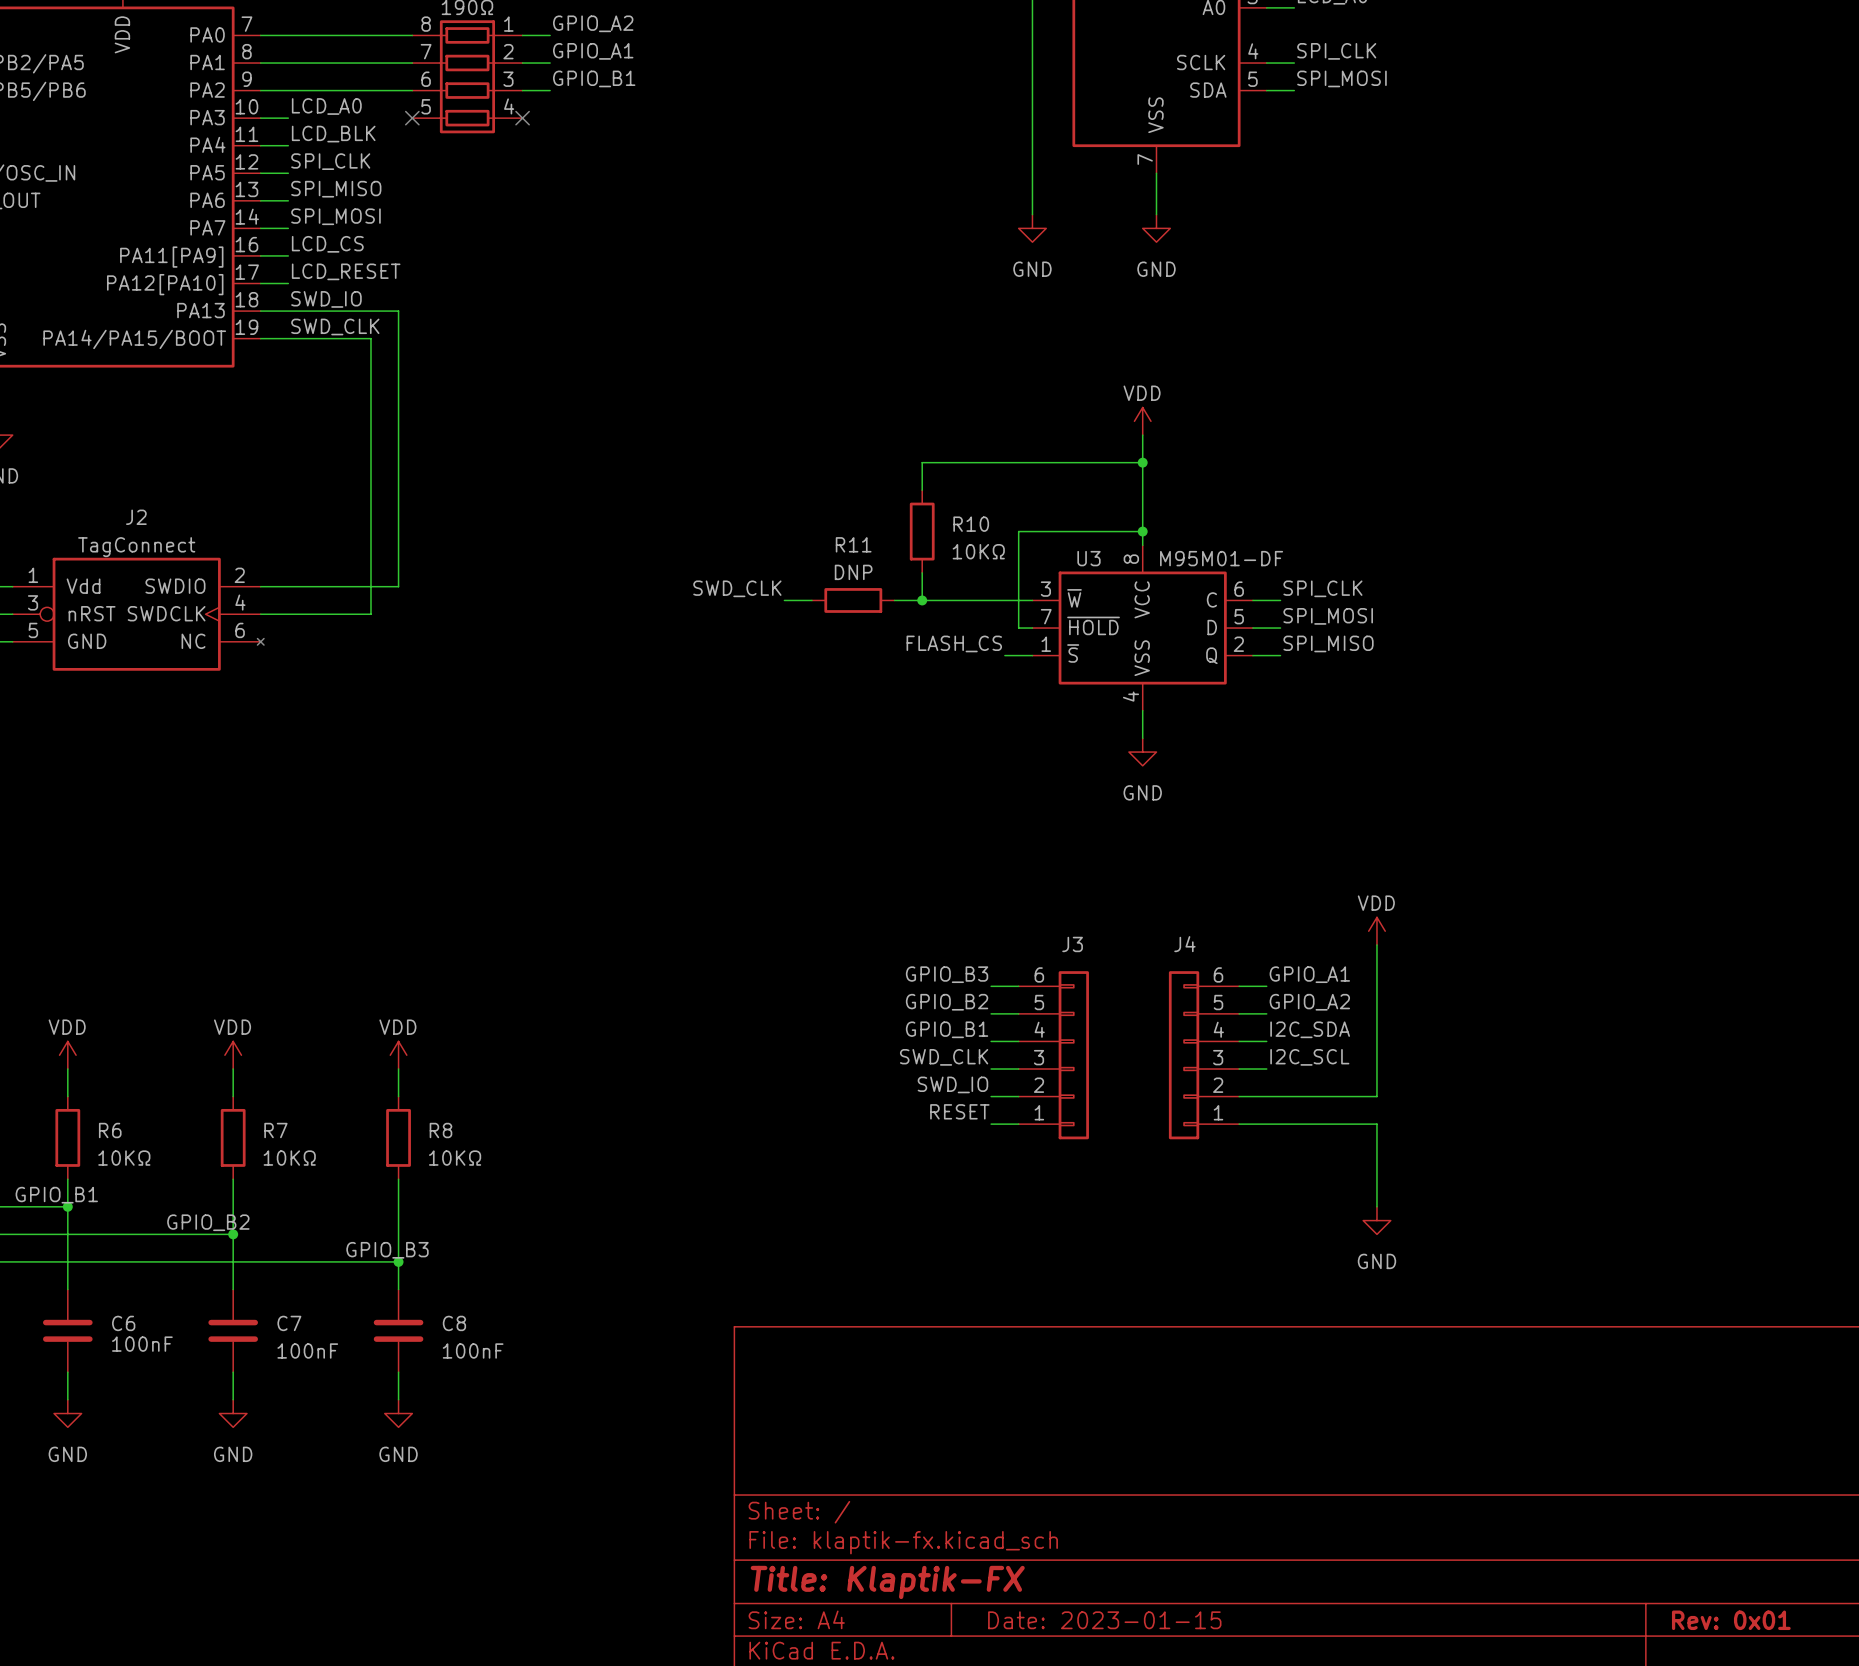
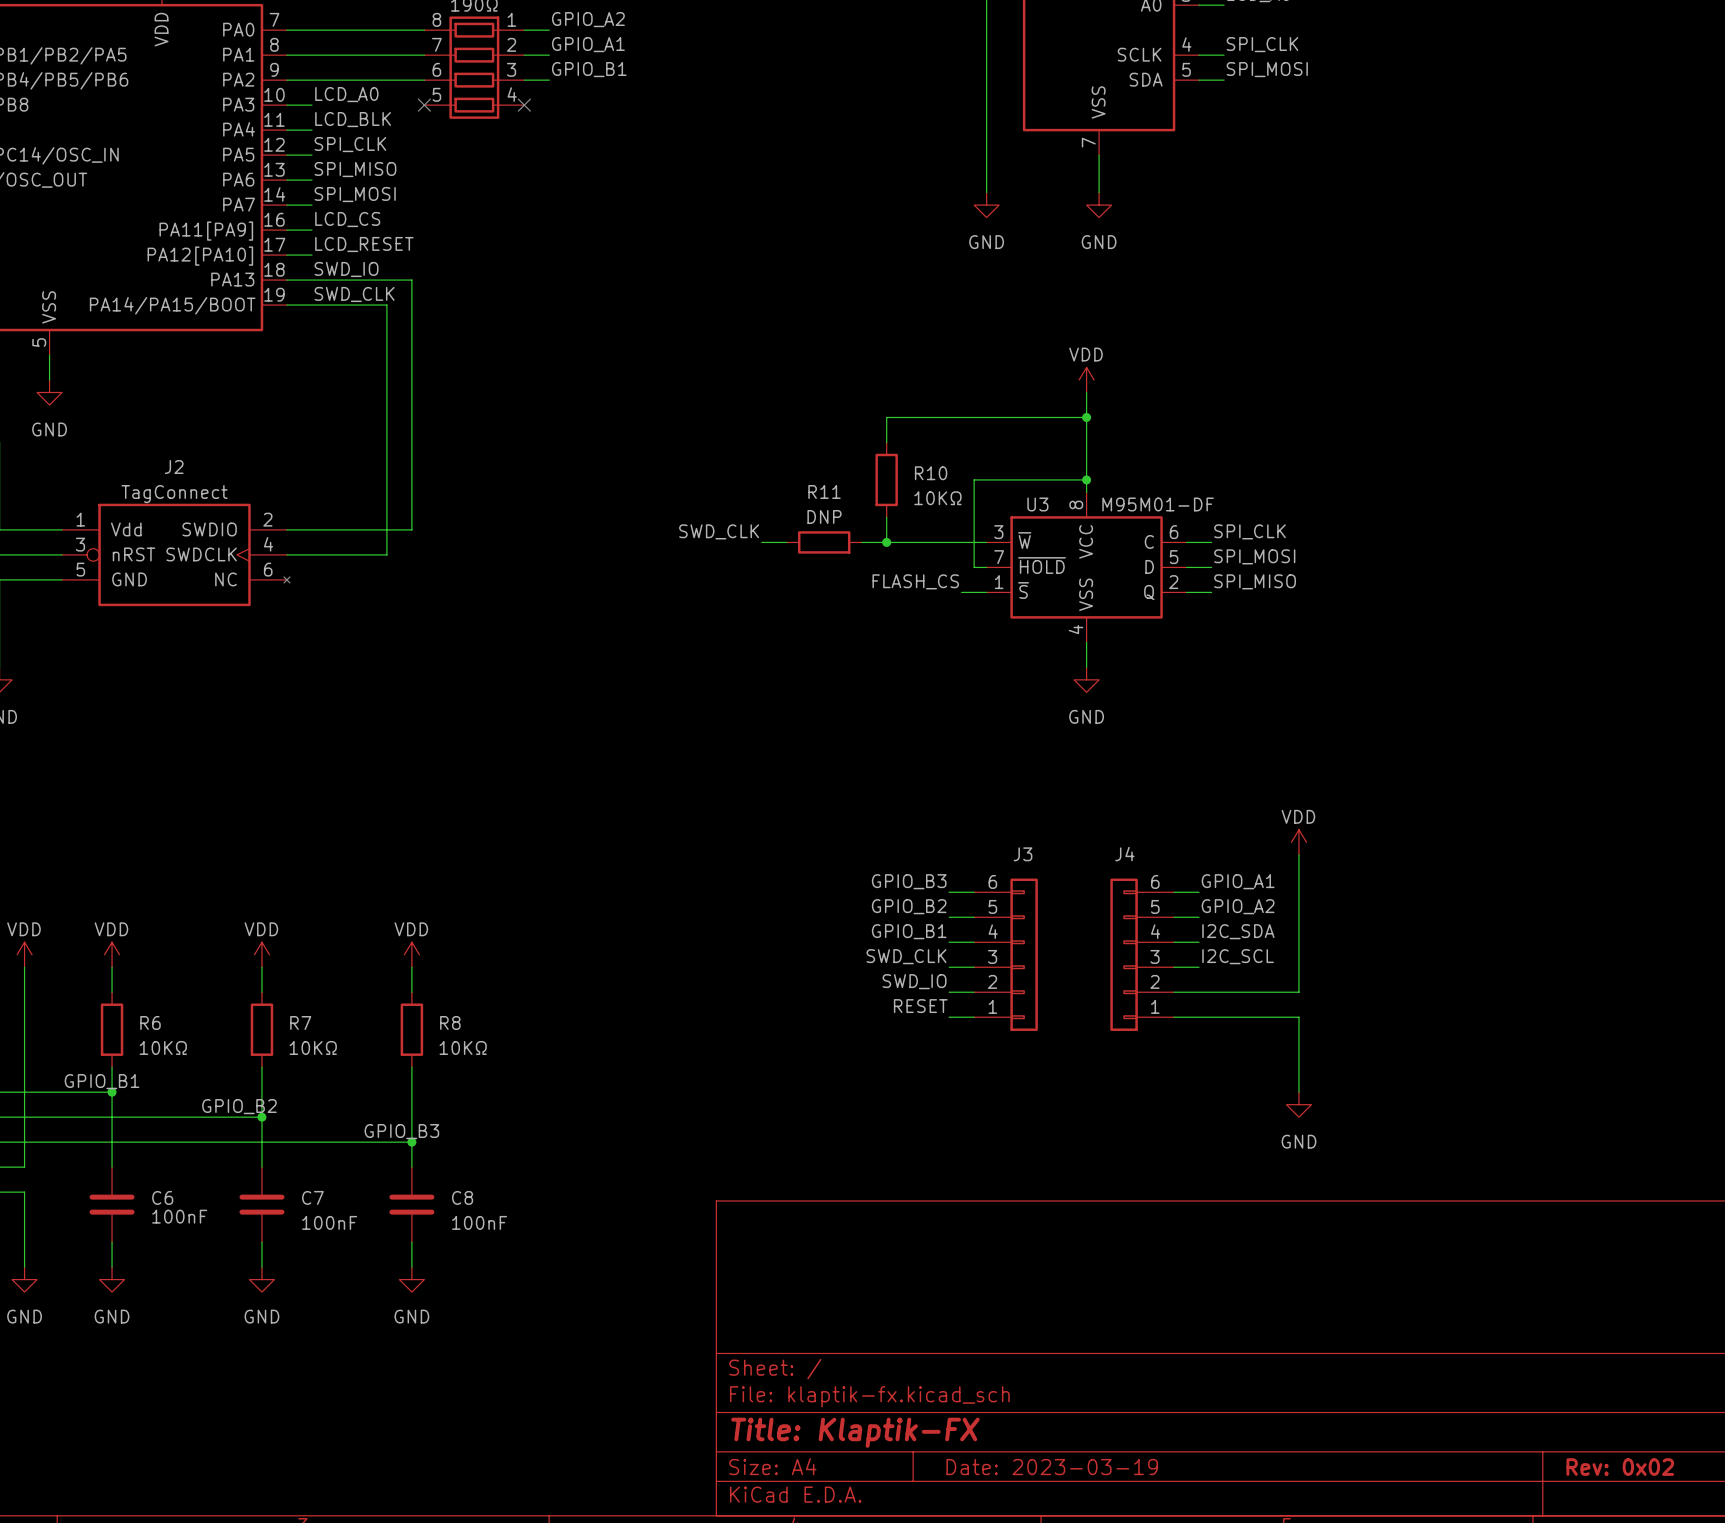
title block: Date: 2023-01-15 (1104, 1620) -> Date: 2023-03-19 (1052, 1467)
title block: Rev: 0x01 (1731, 1620) -> Rev: 0x02 (1620, 1467)

